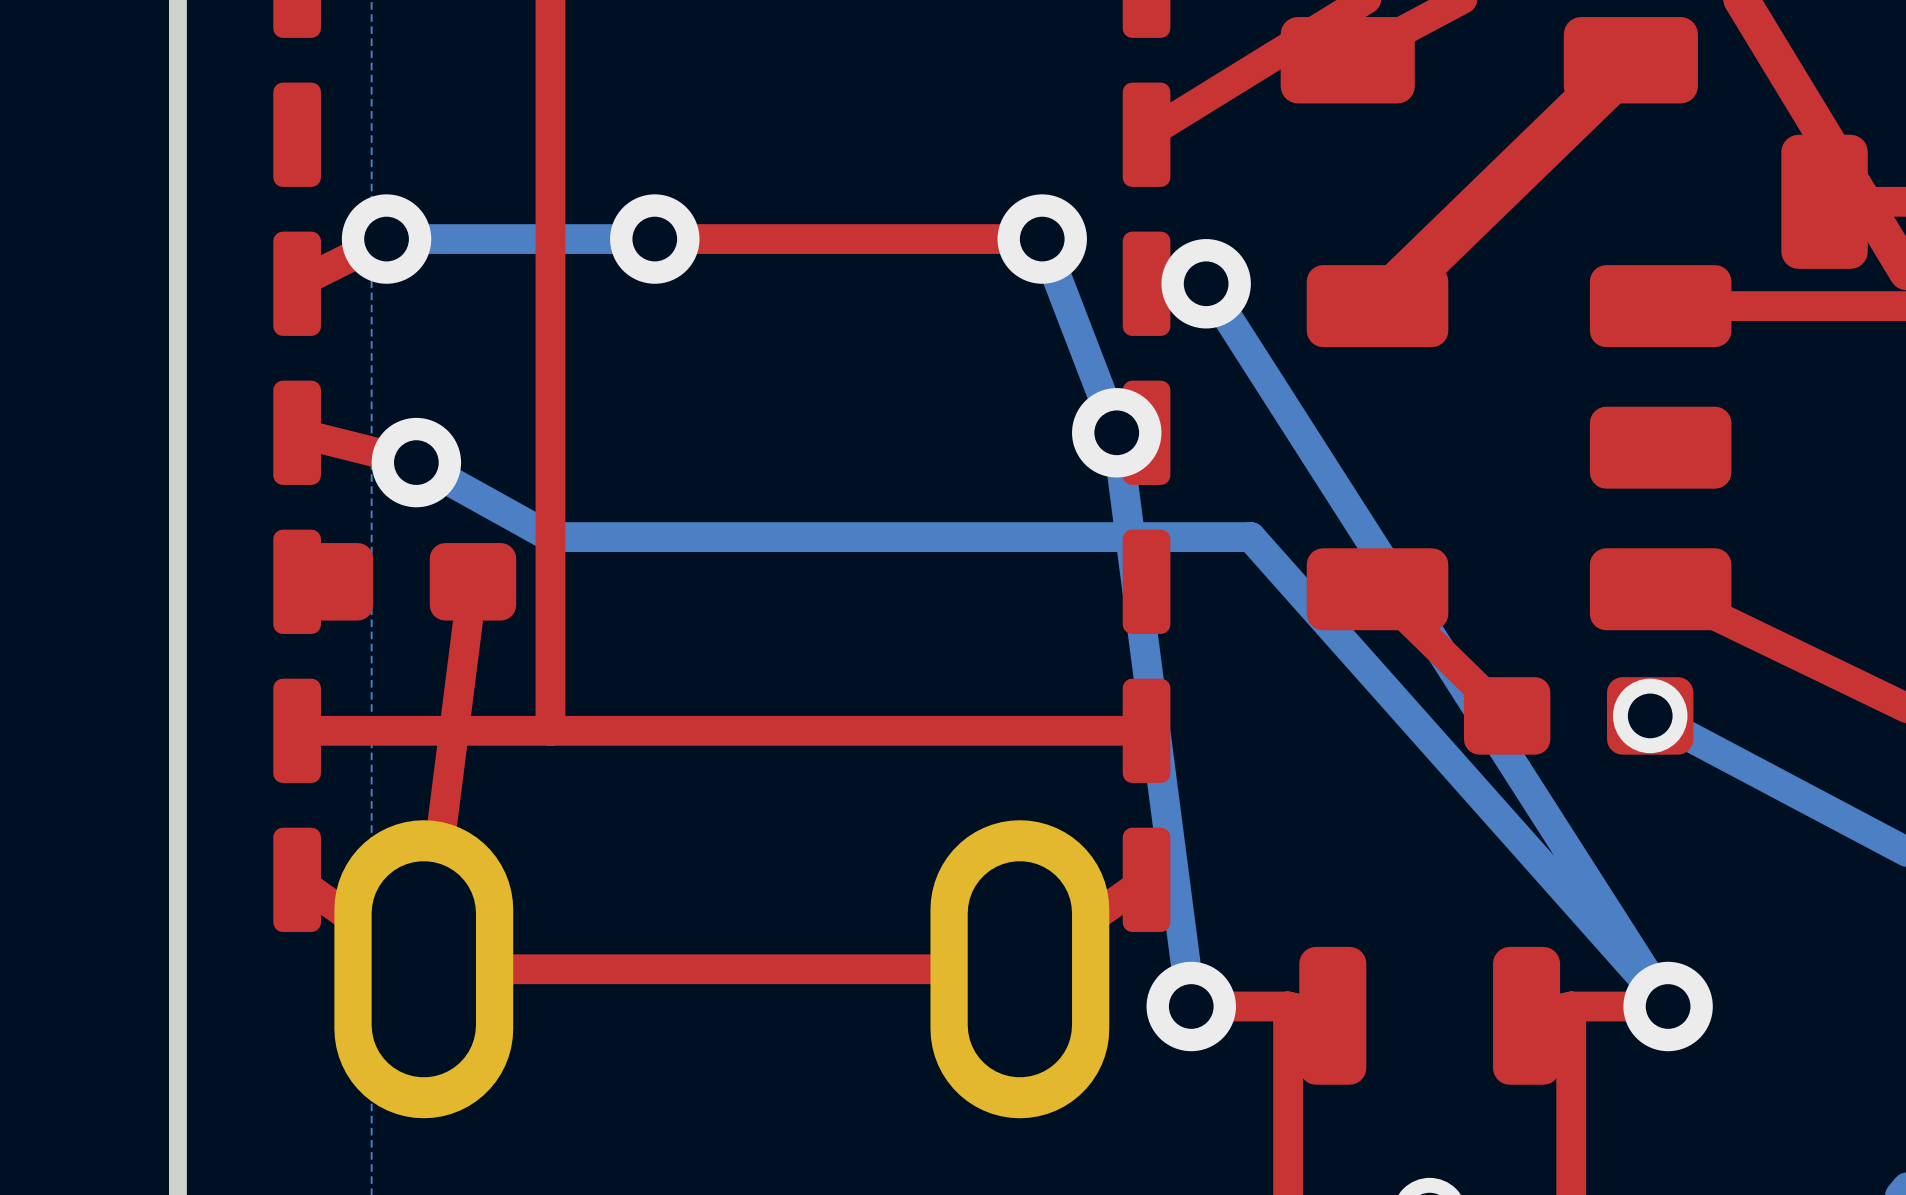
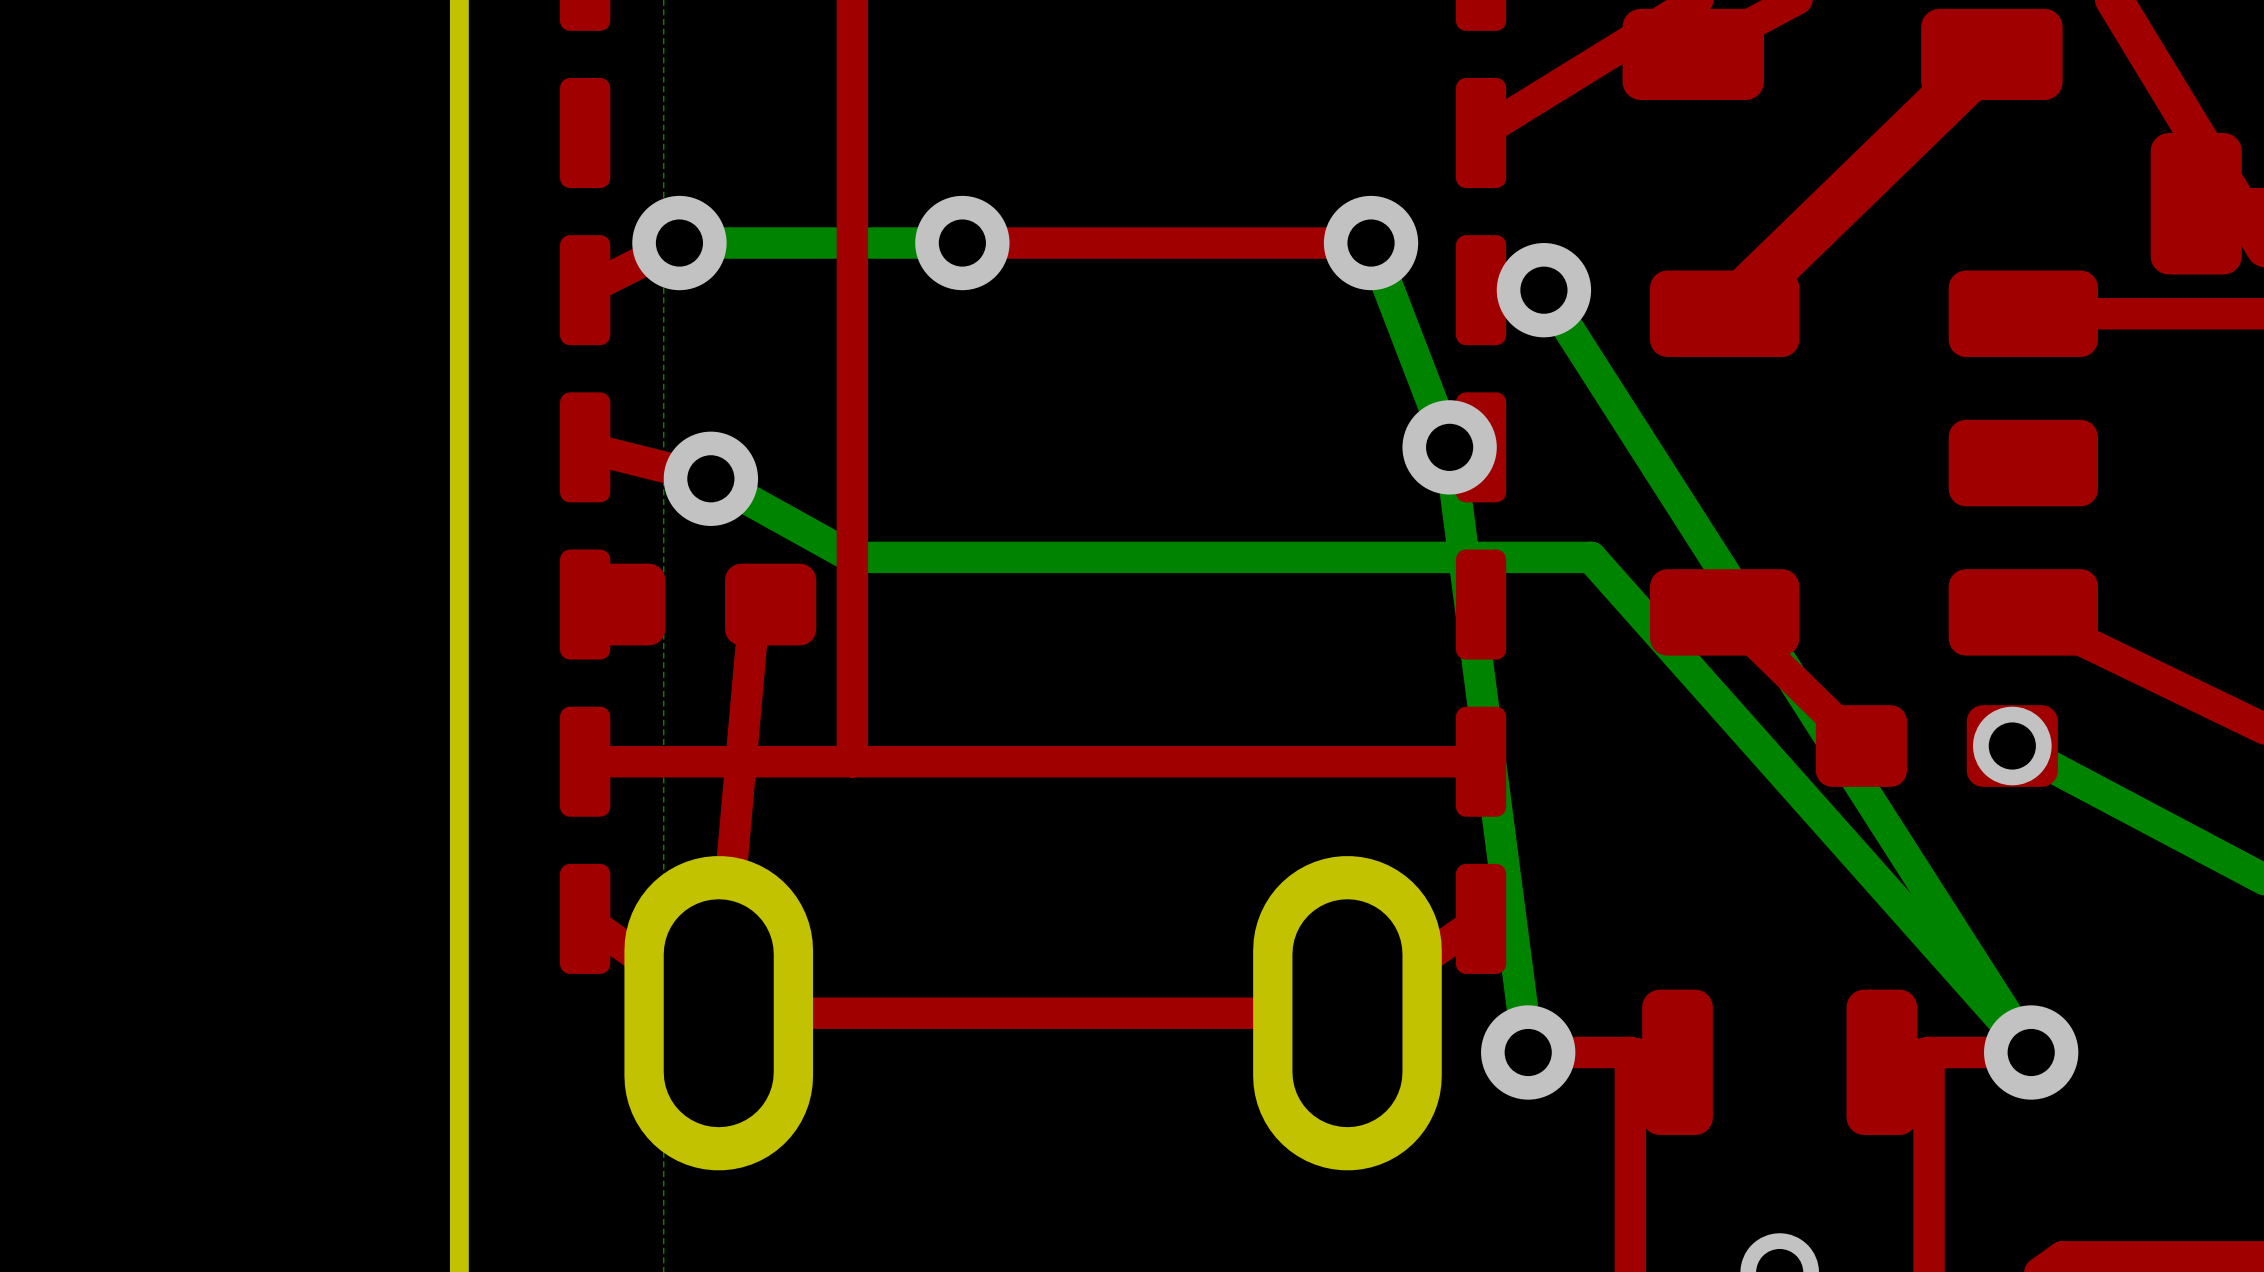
top track: (472, 581) (423, 969) -> (754, 604) (718, 1013)

